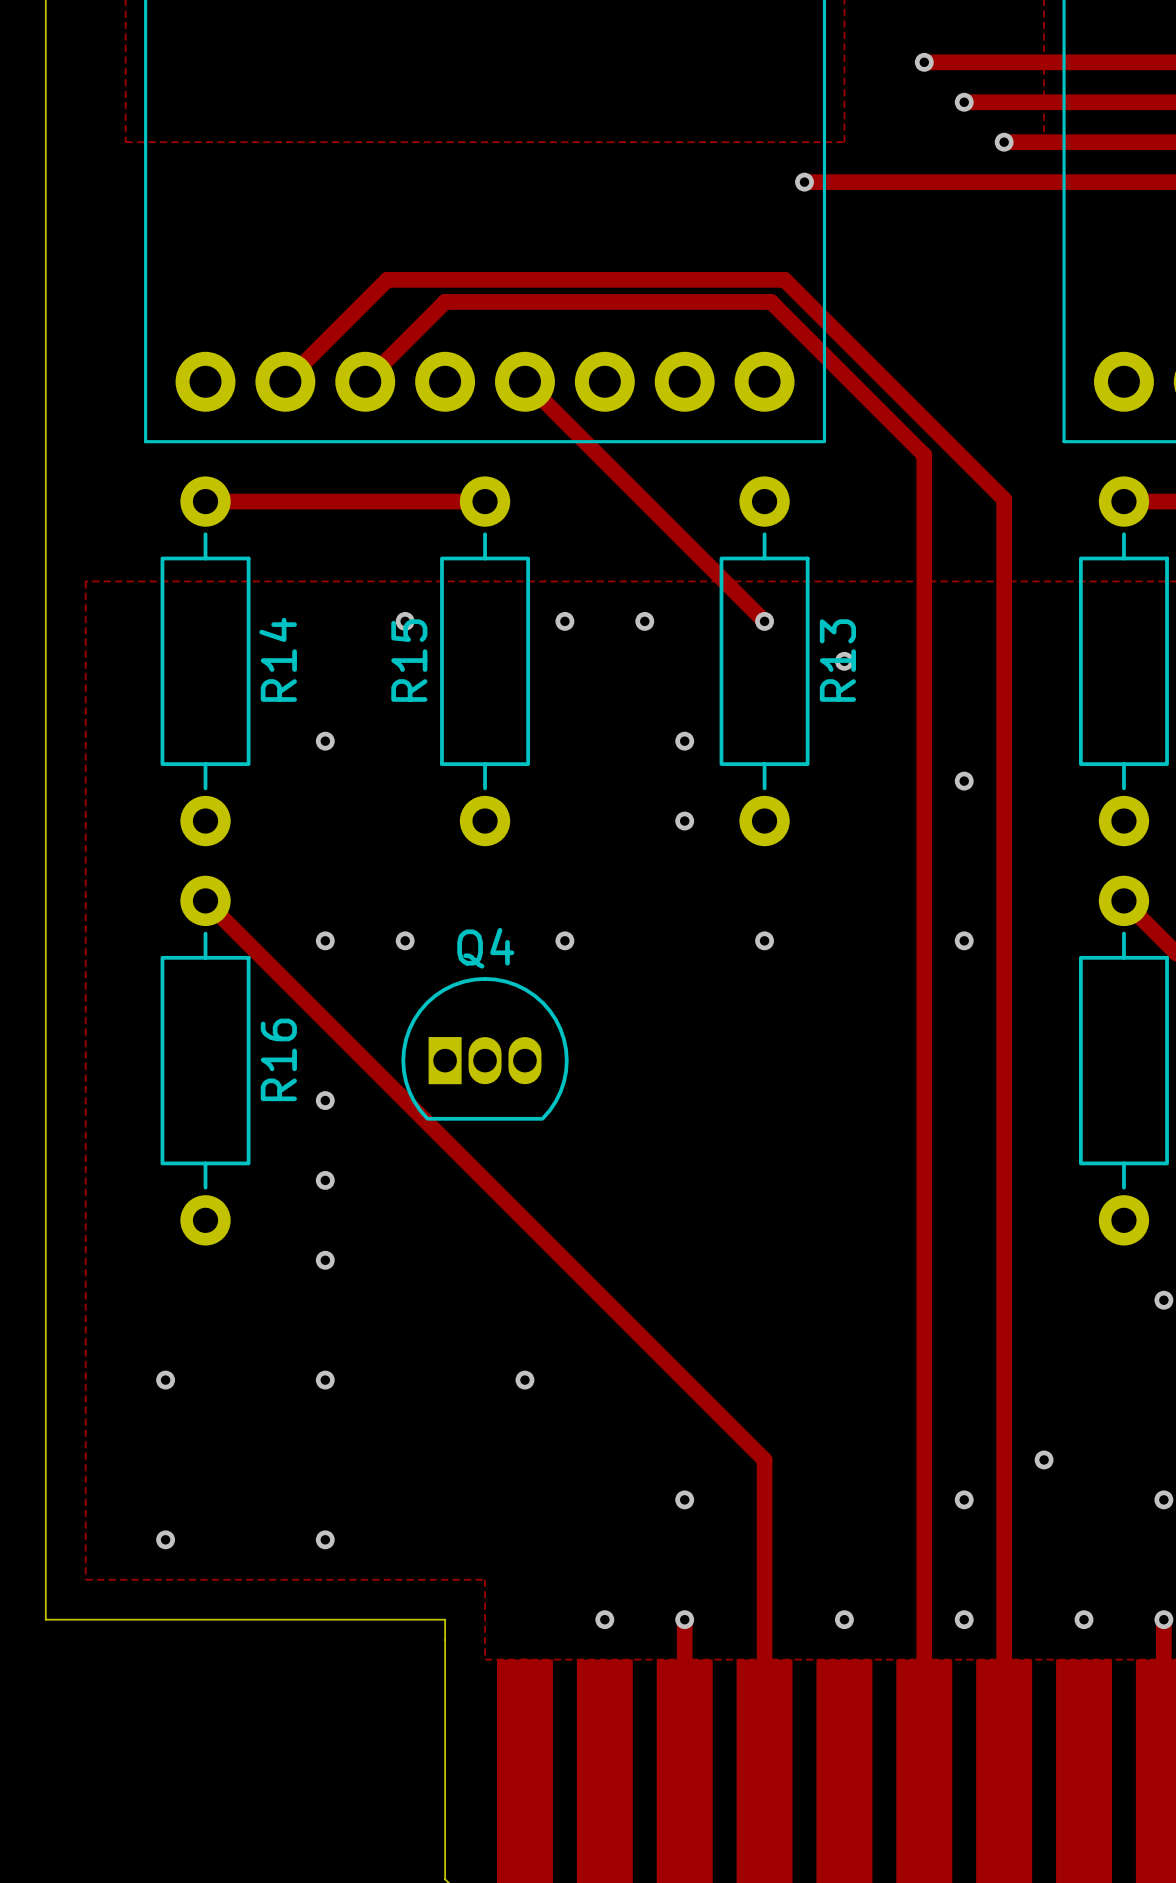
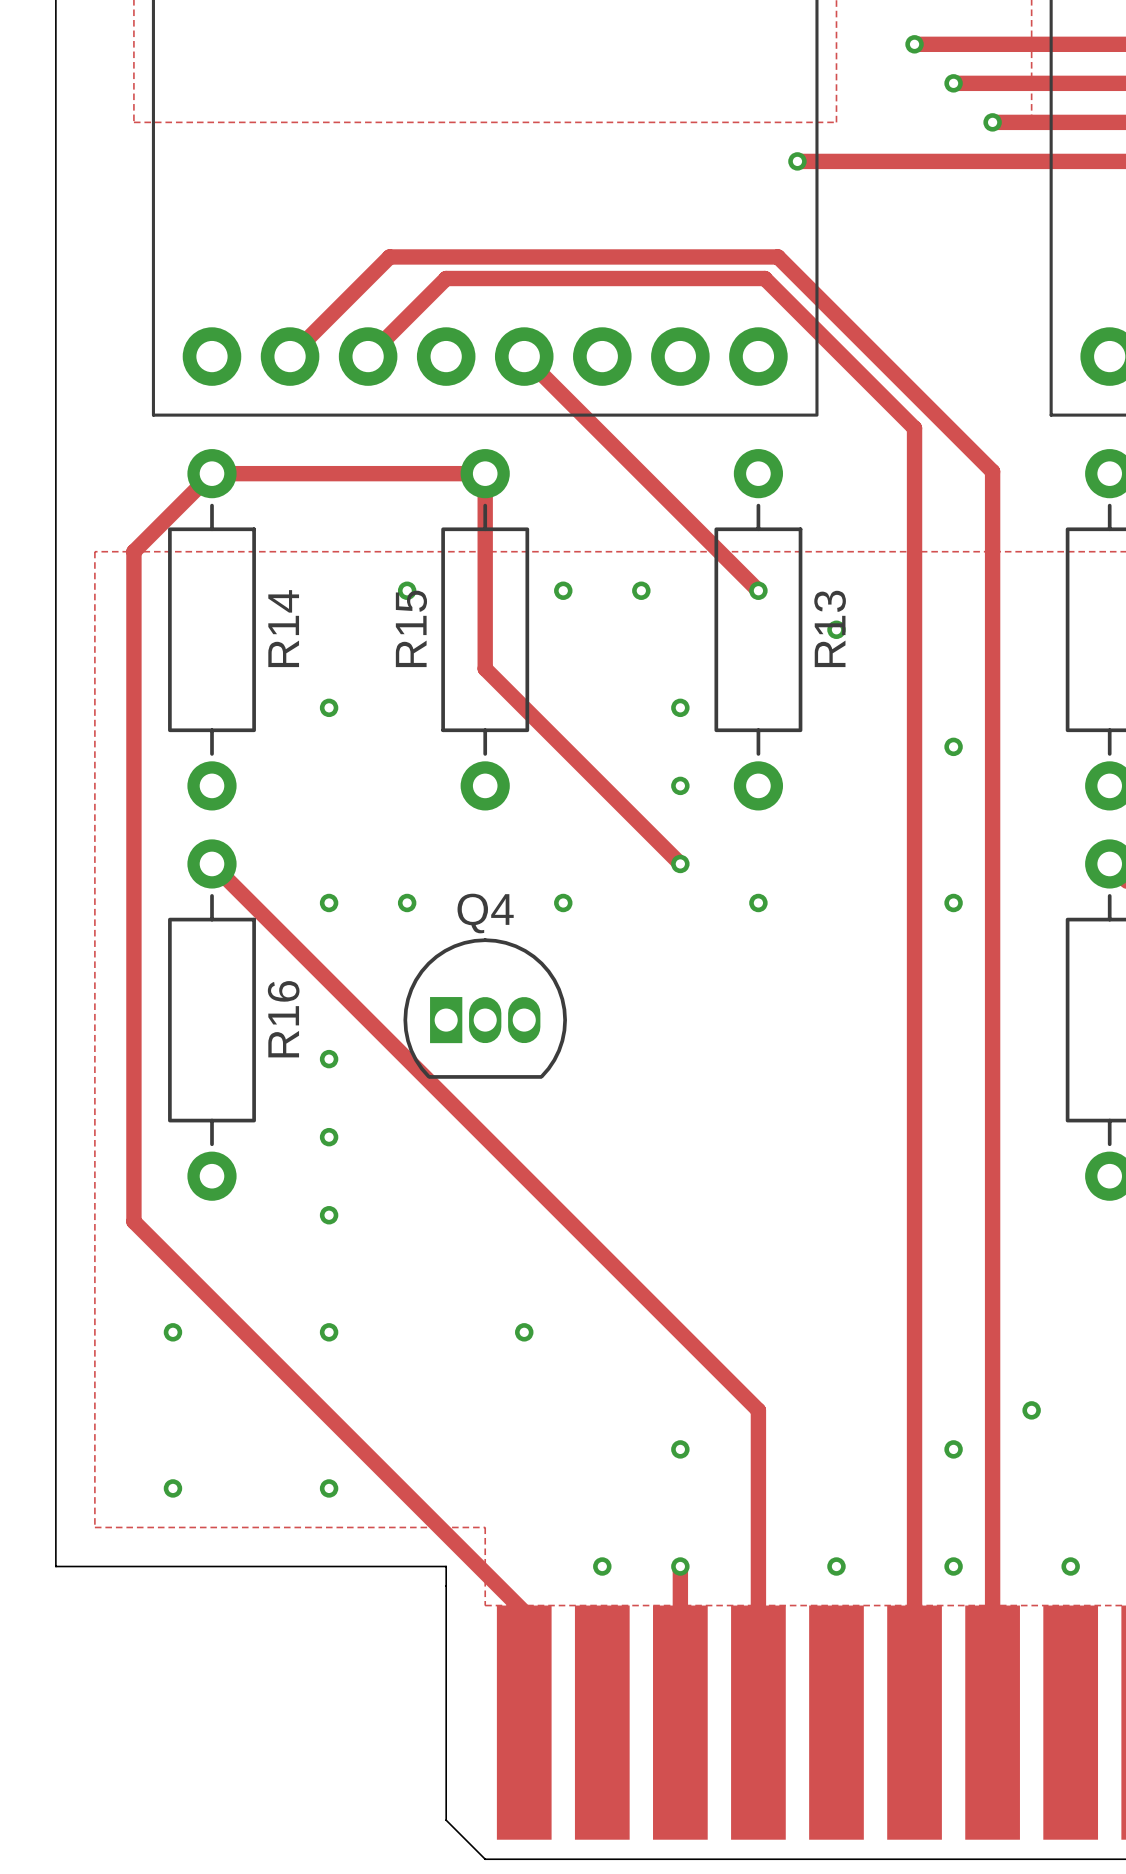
track: none -> (211, 473) (133, 551) (133, 1221) (524, 1611)
track: none -> (485, 473) (485, 668) (680, 863)
via: none -> (680, 863)

